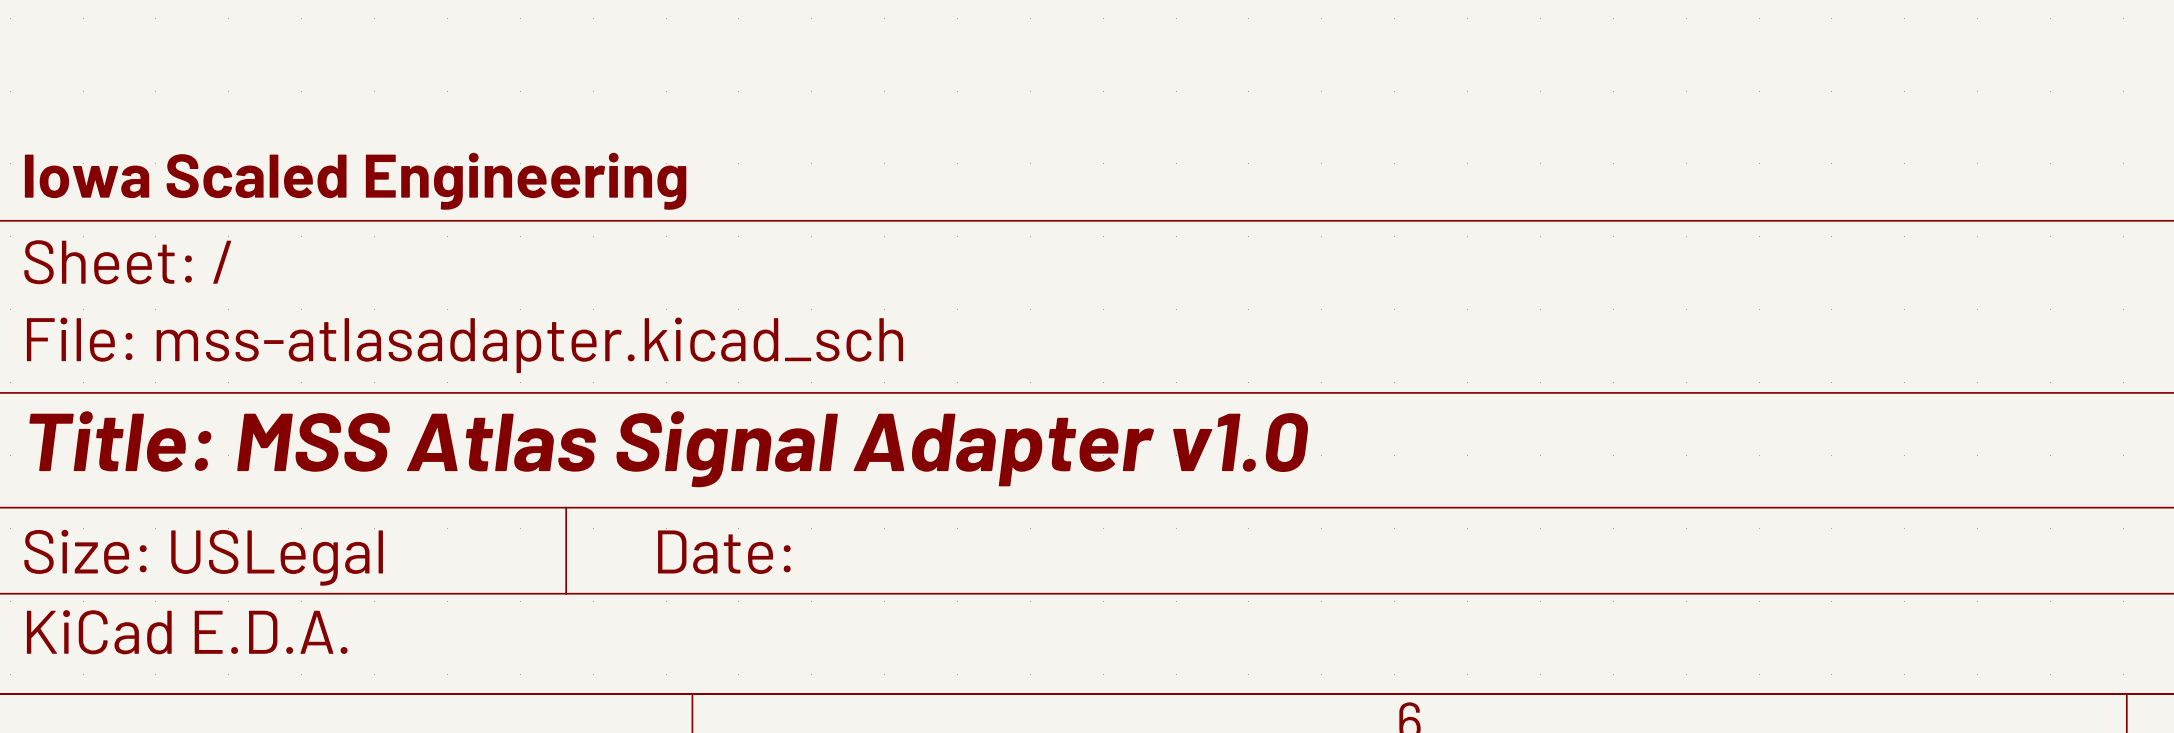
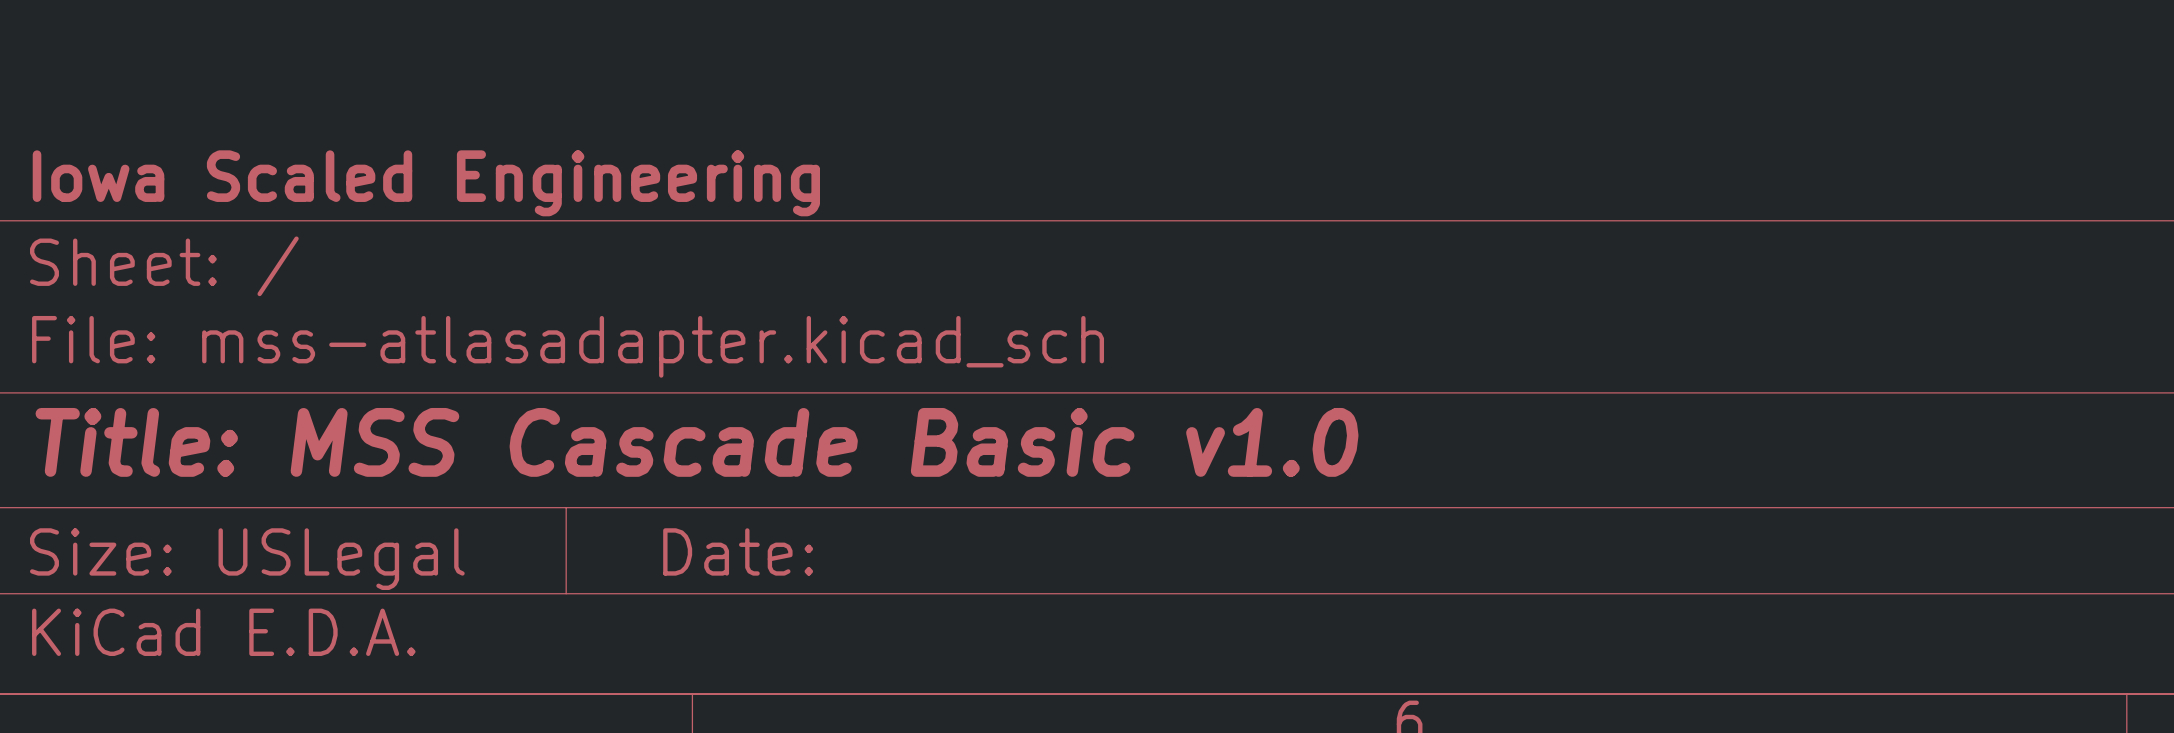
title block: Title: MSS Atlas Signal Adapter v1.0 (669, 449) -> Title: MSS Cascade Basic v1.0 (697, 442)

